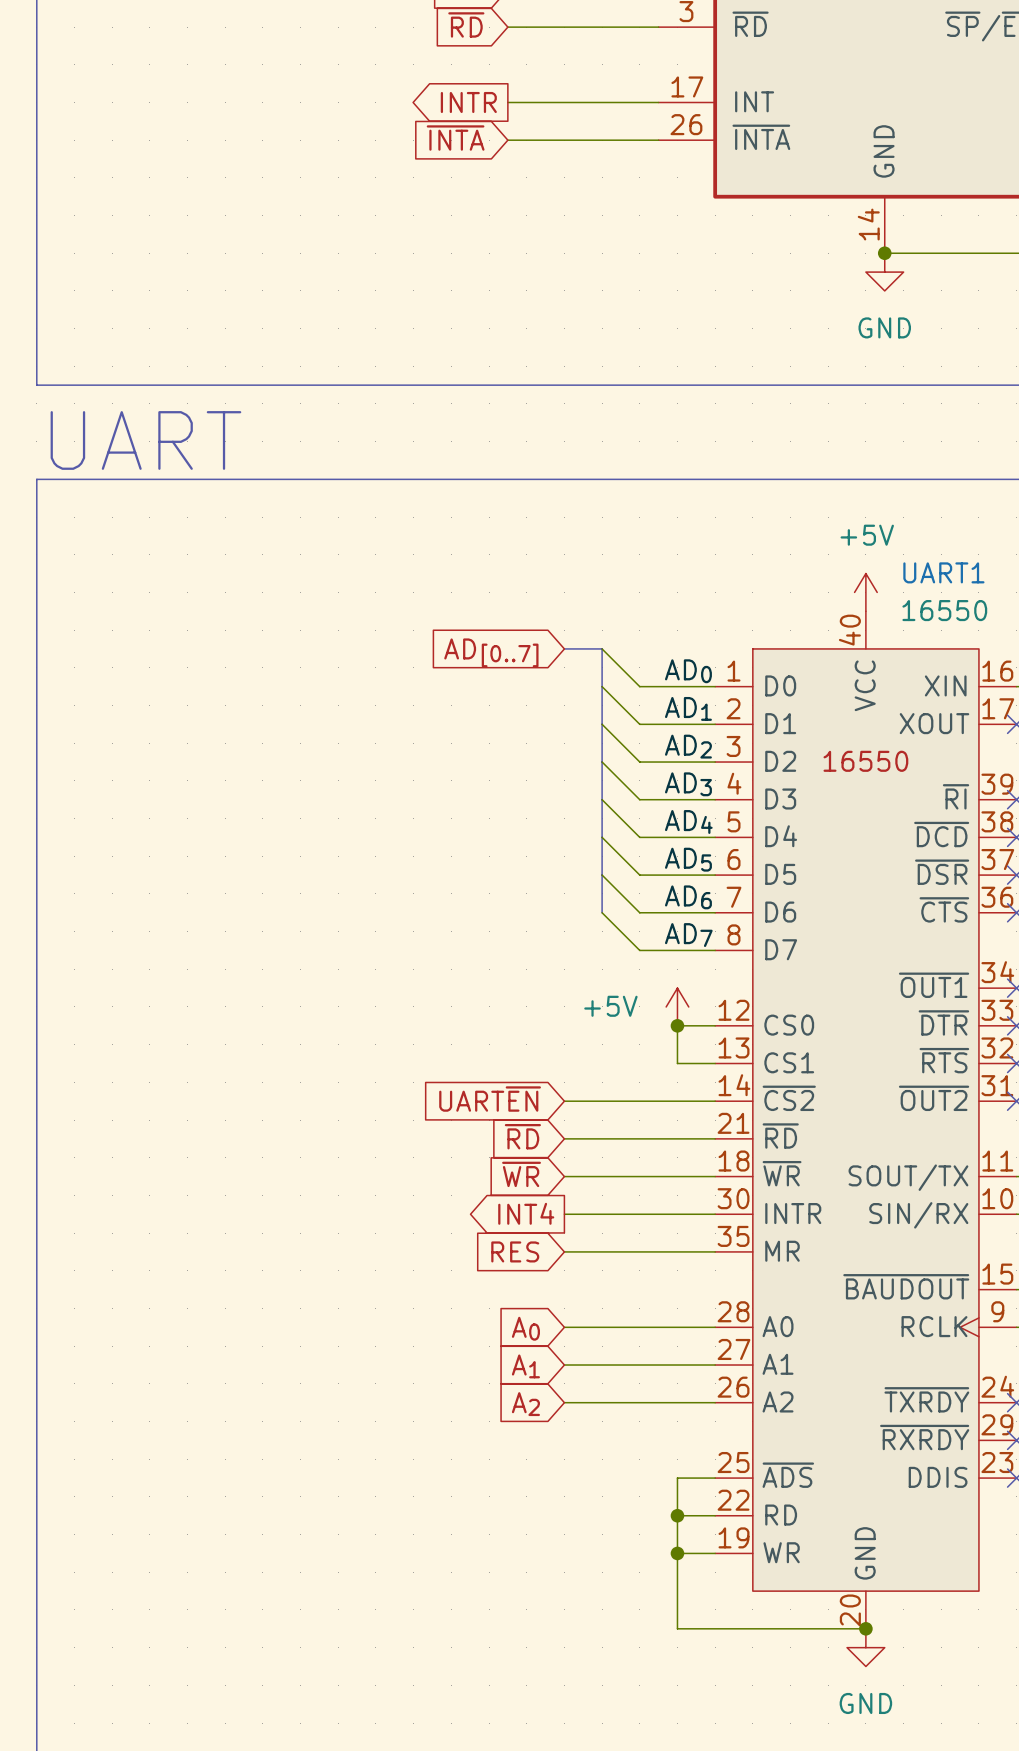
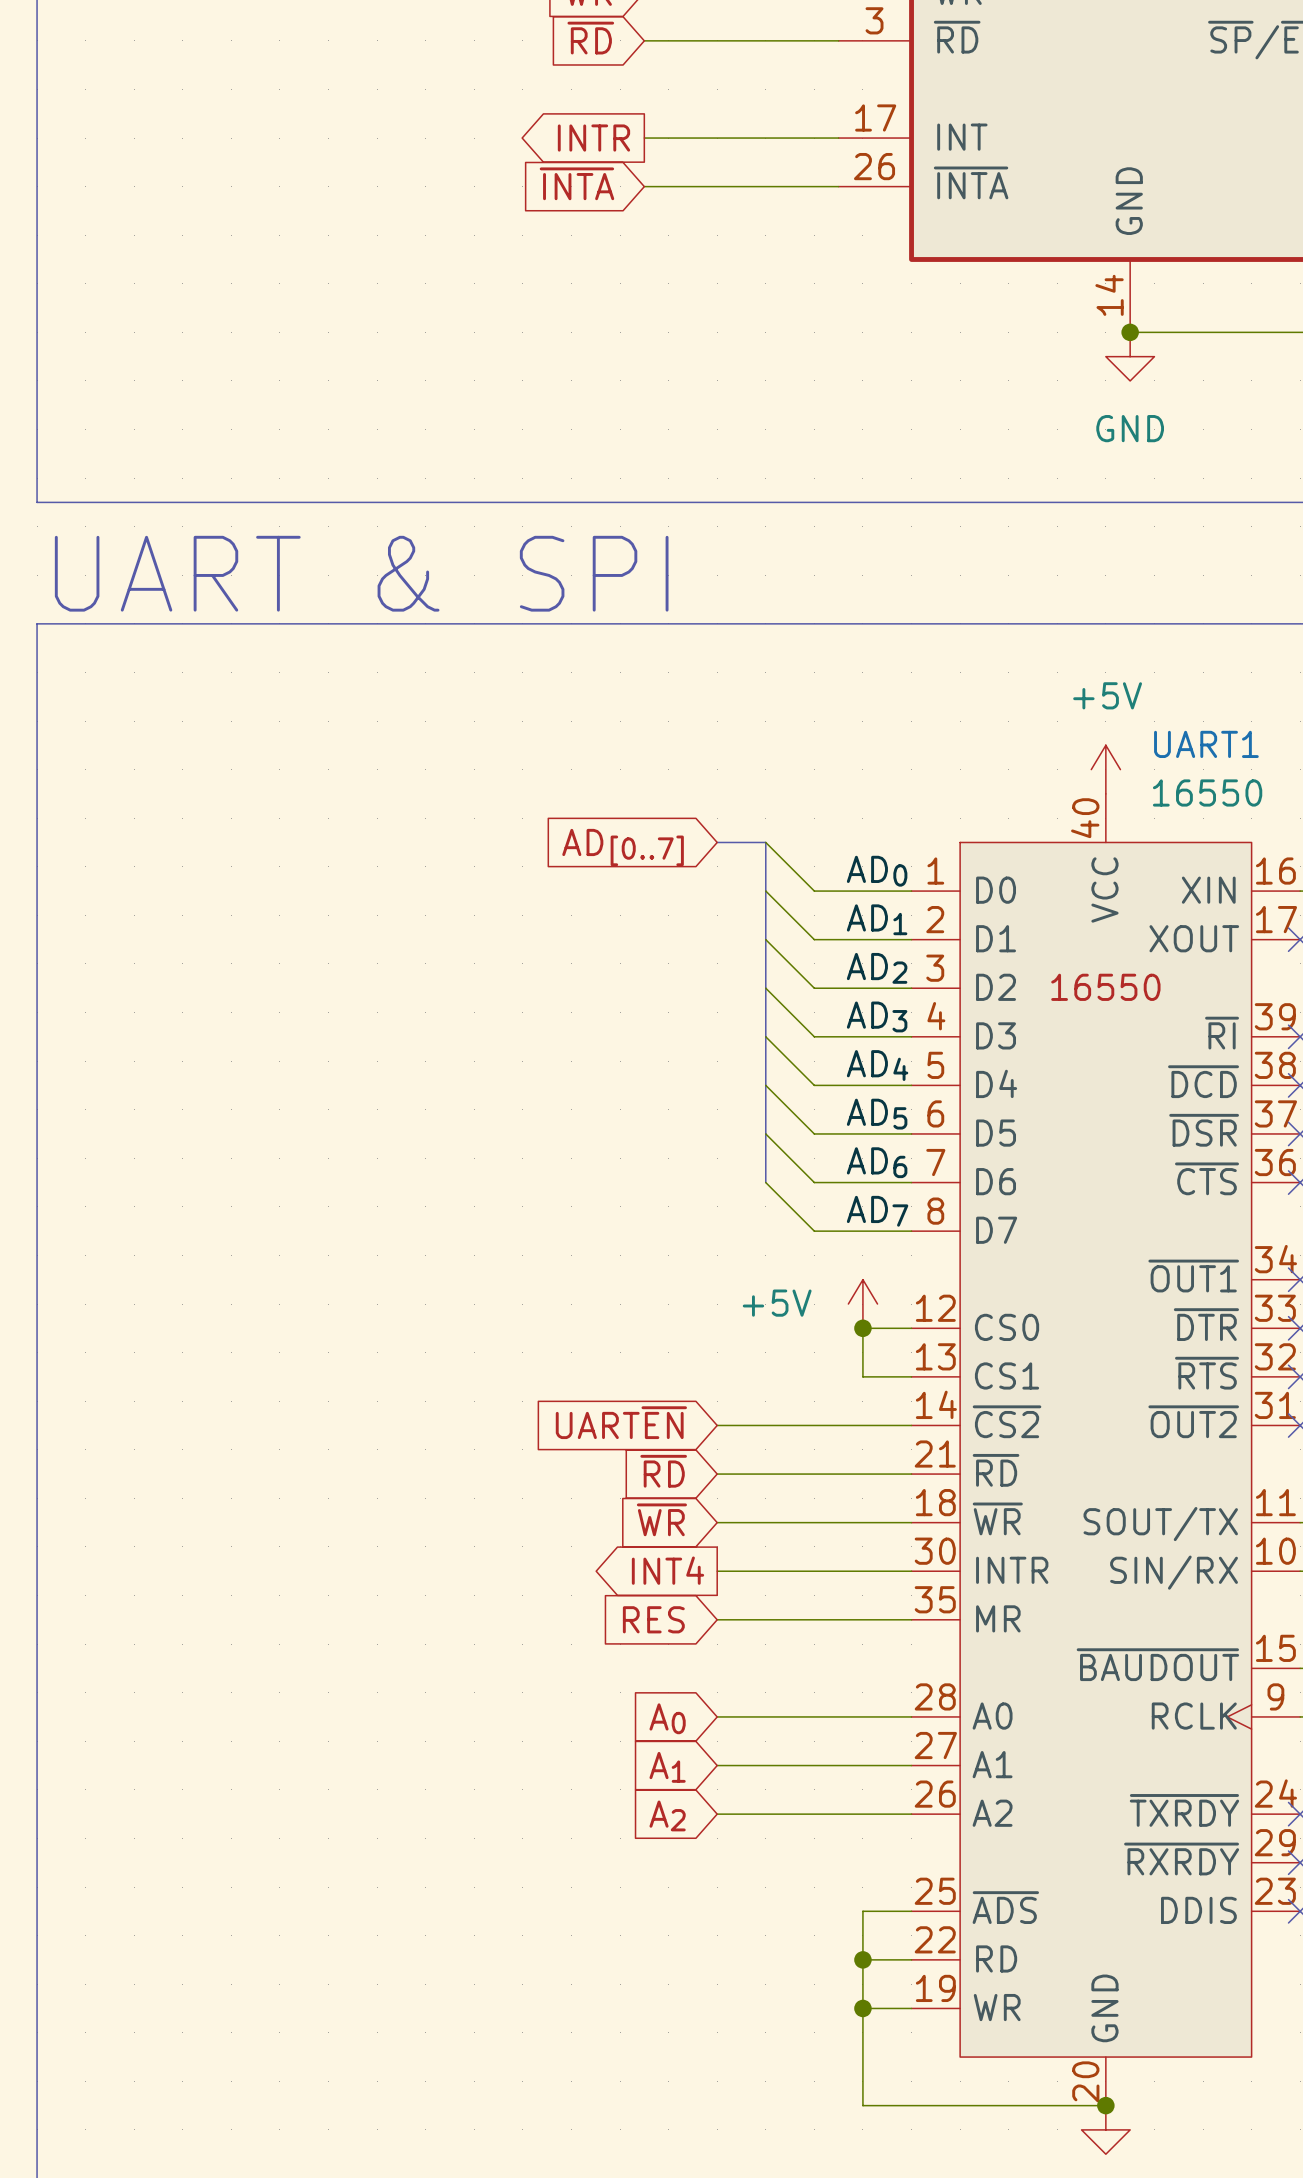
text: UART (145, 440) -> UART & SPI (361, 573)

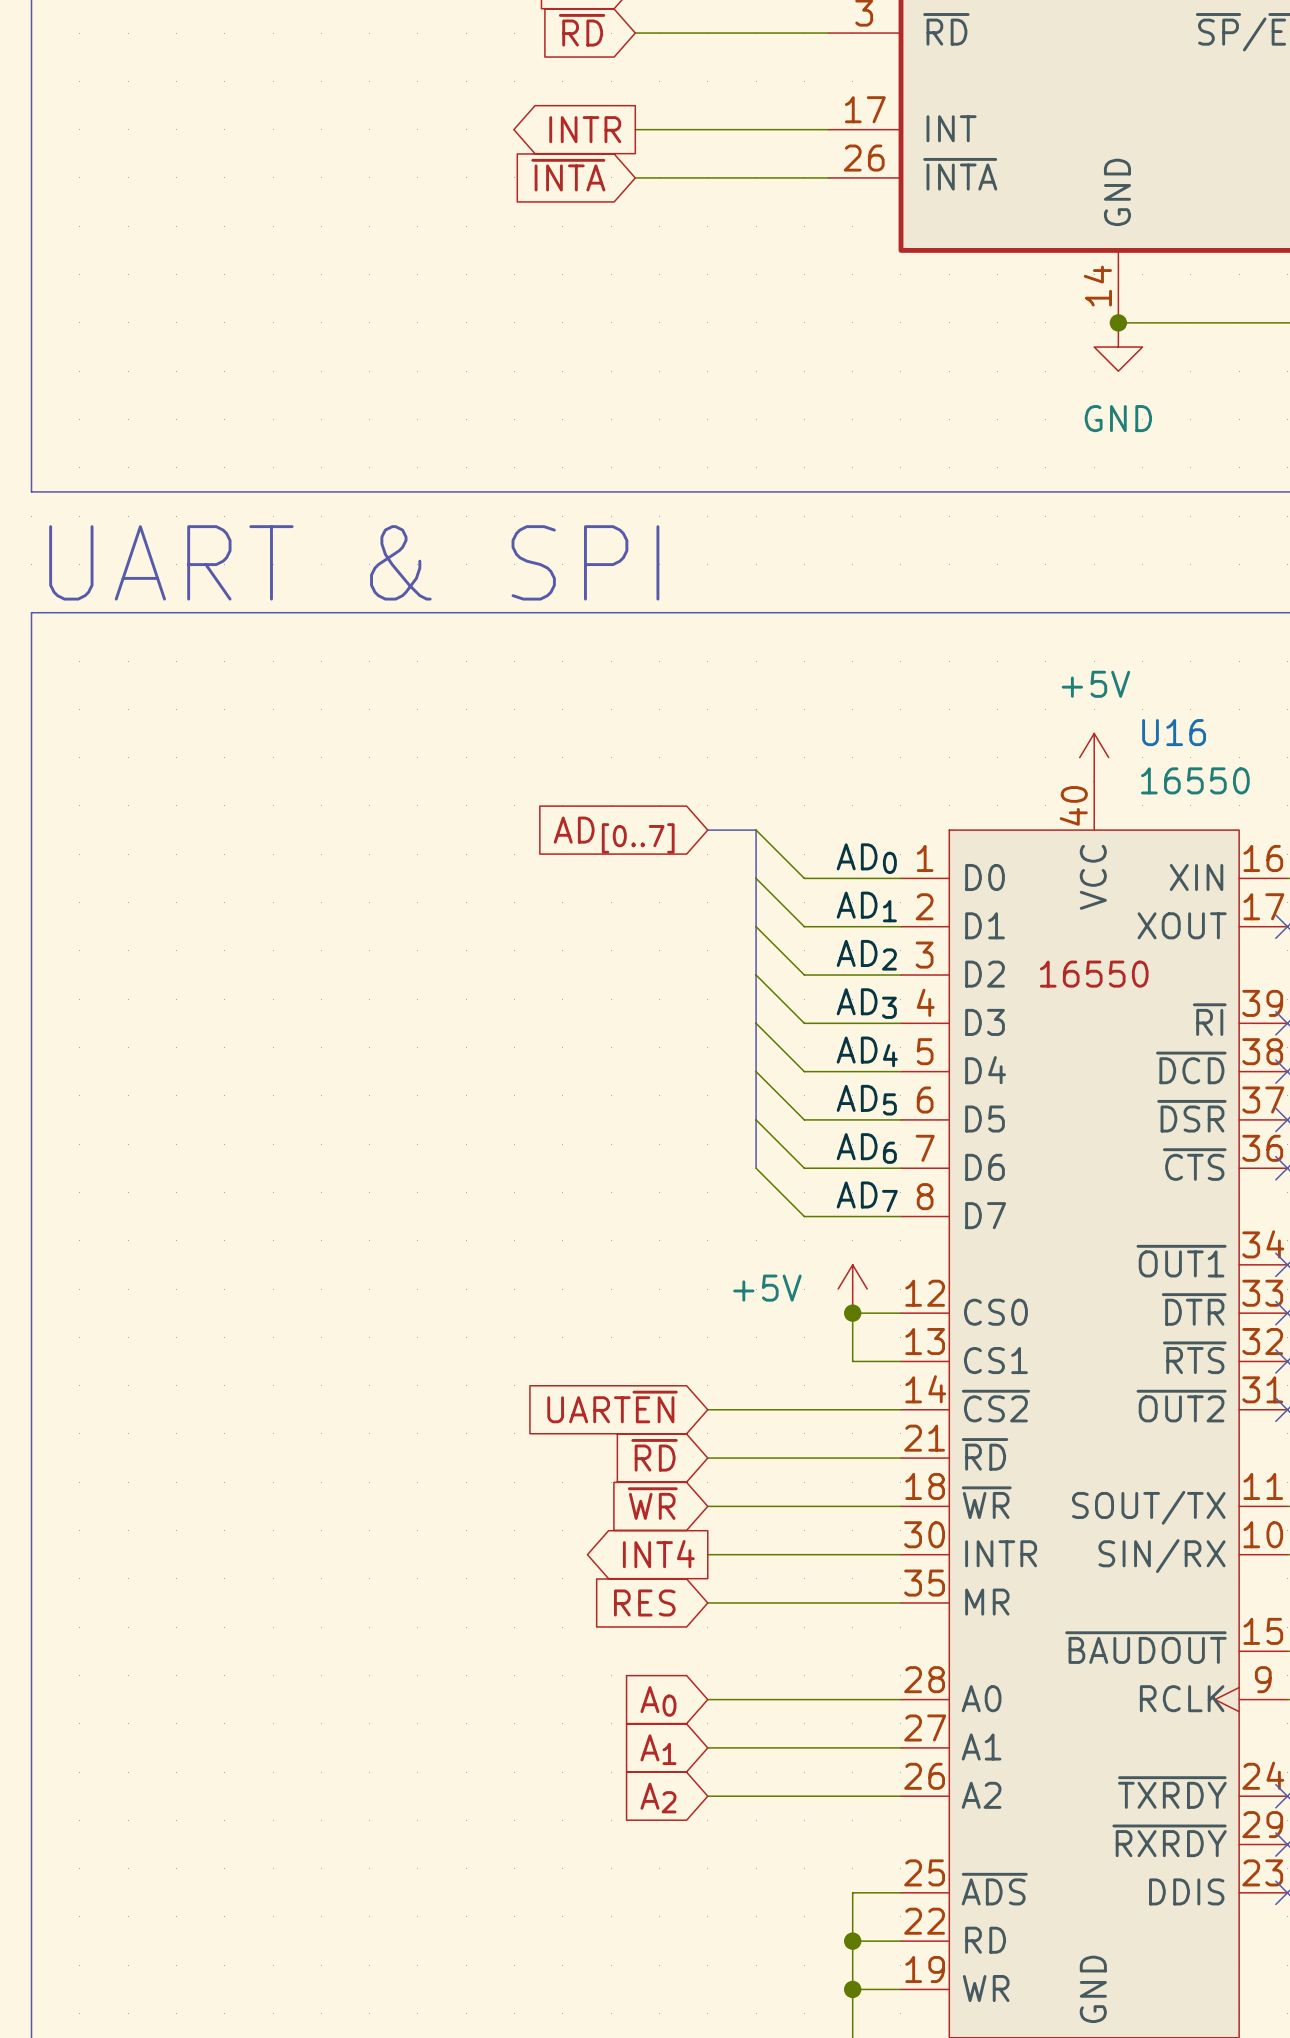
UART1 name: UART1 (1206, 744) -> U16 (1174, 732)

